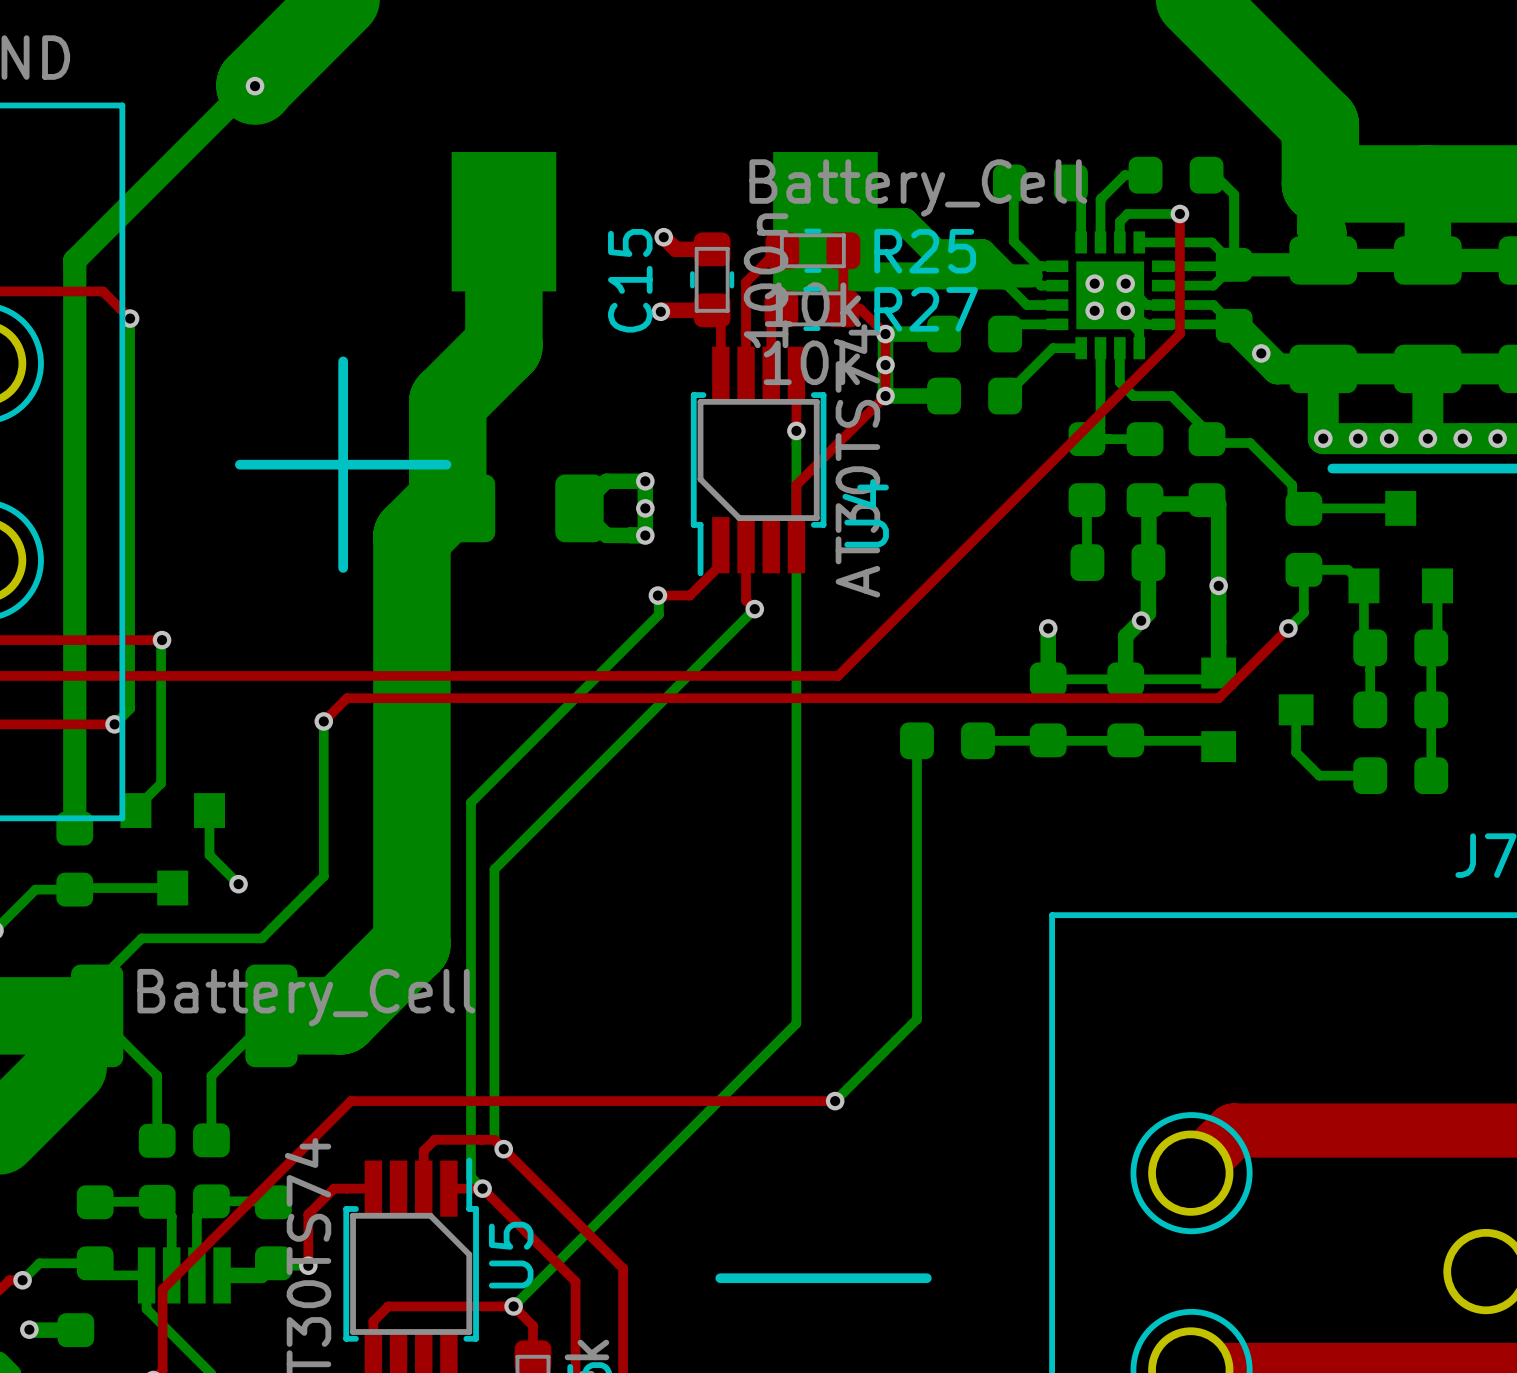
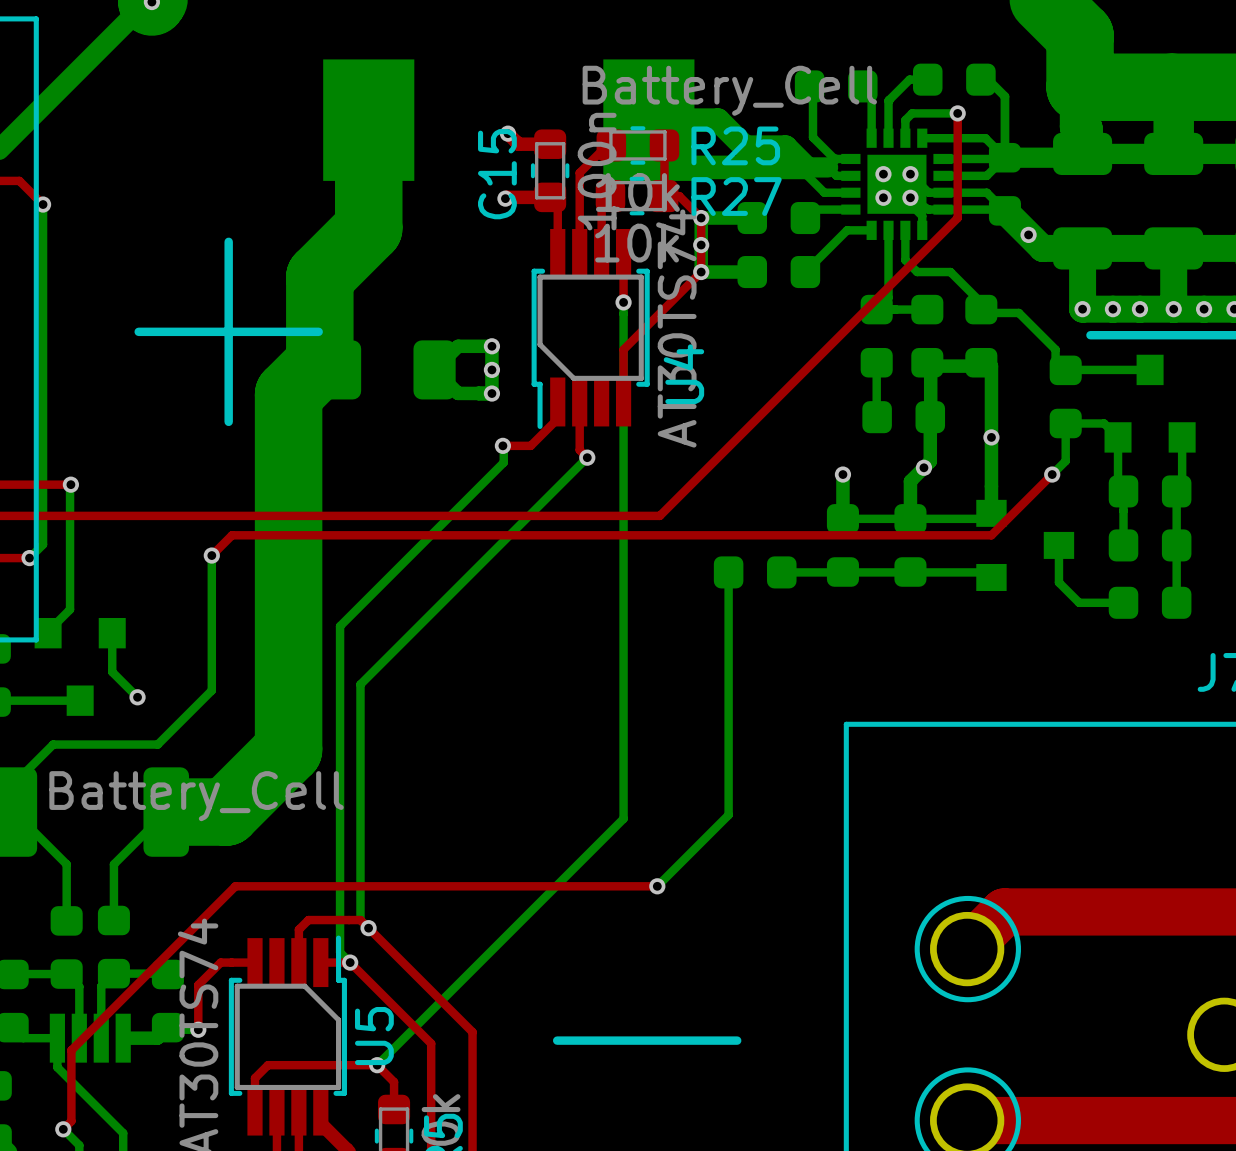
C15 name position: C15 (630, 280) -> C15 (497, 174)
U5 name position: U5 (511, 1255) -> U5 (374, 1036)

